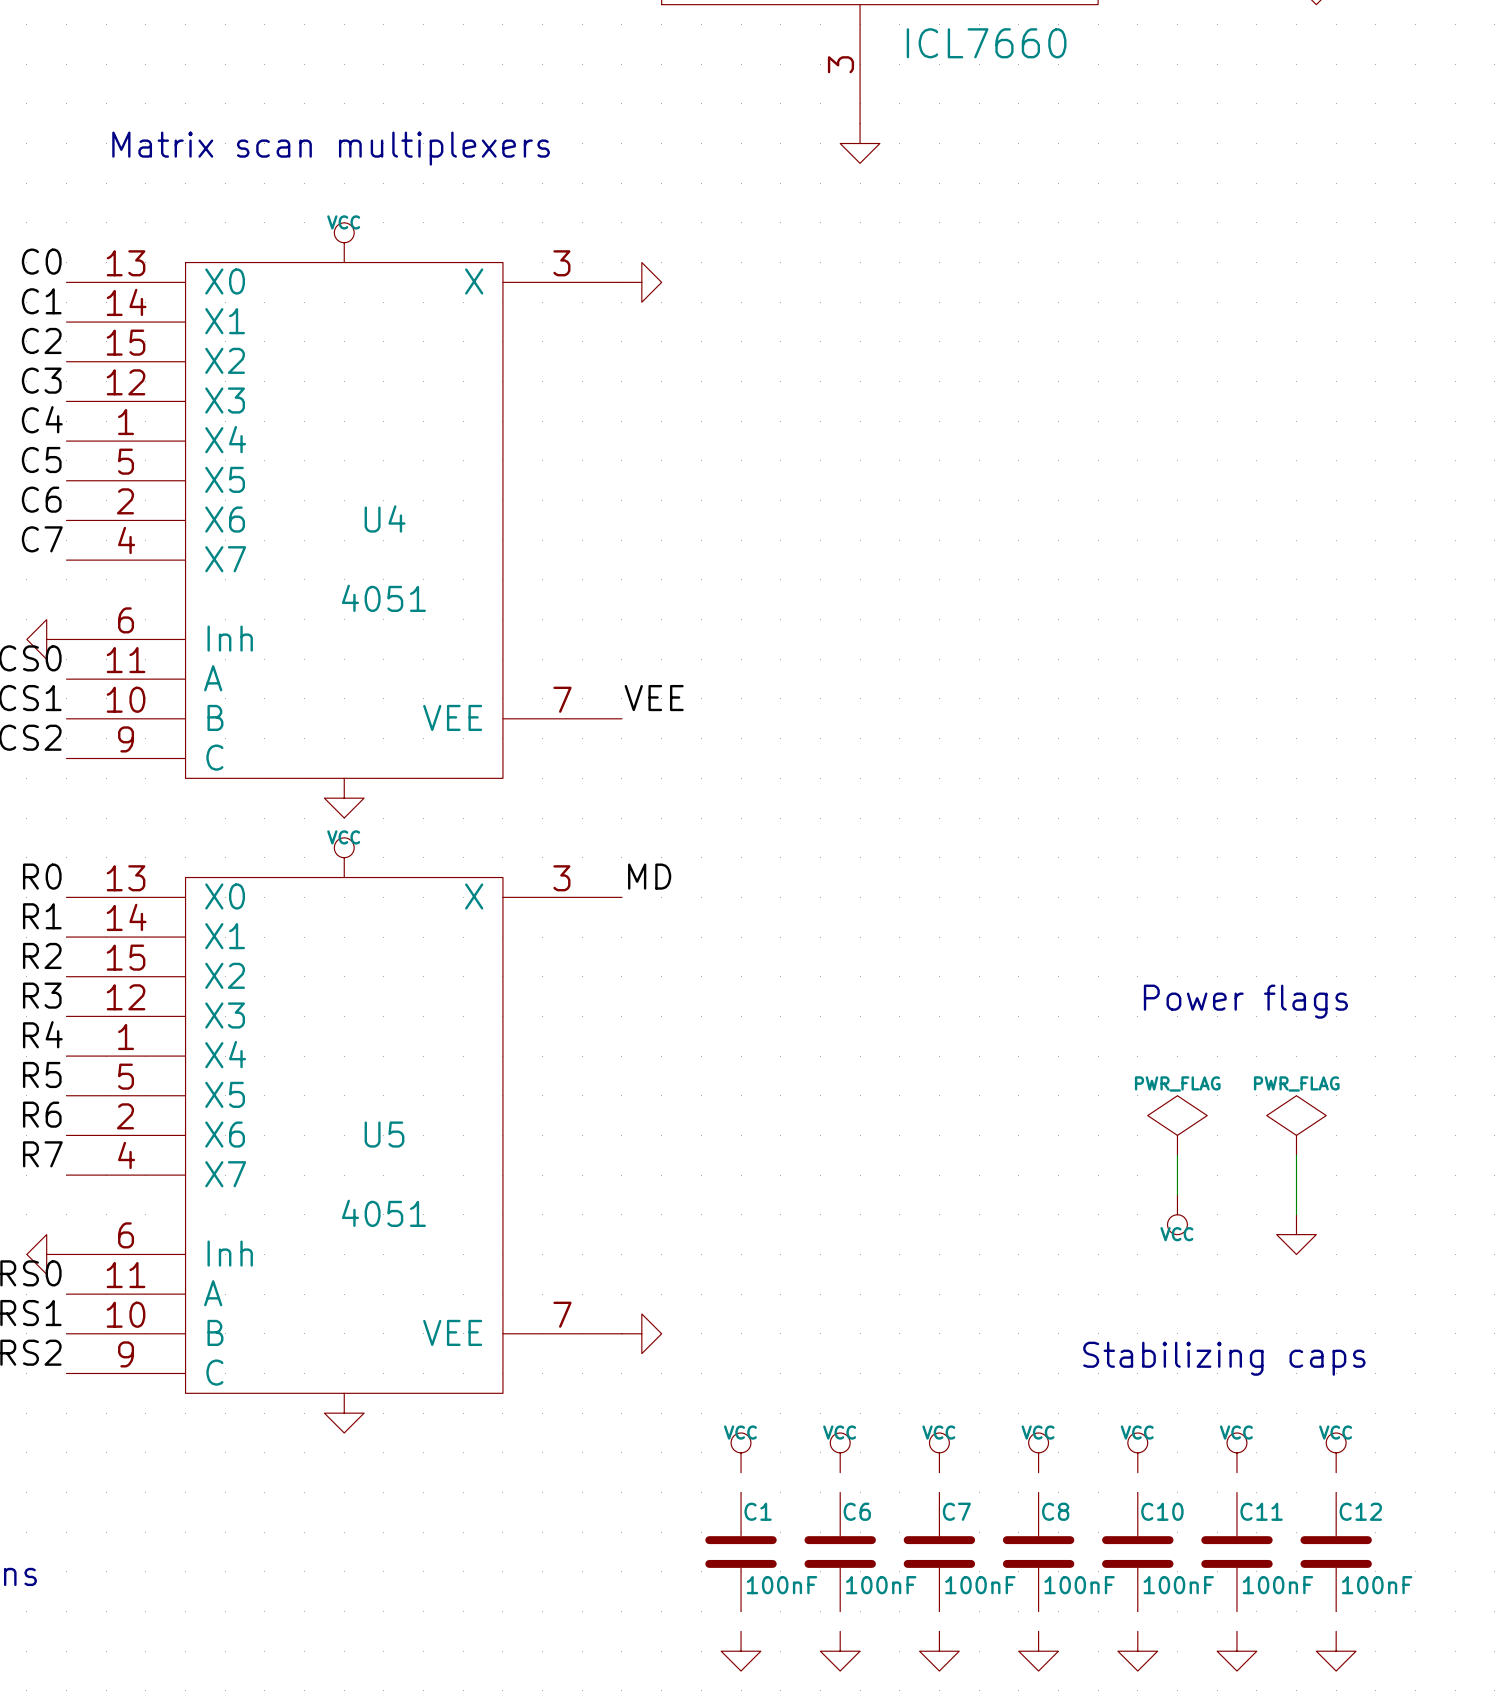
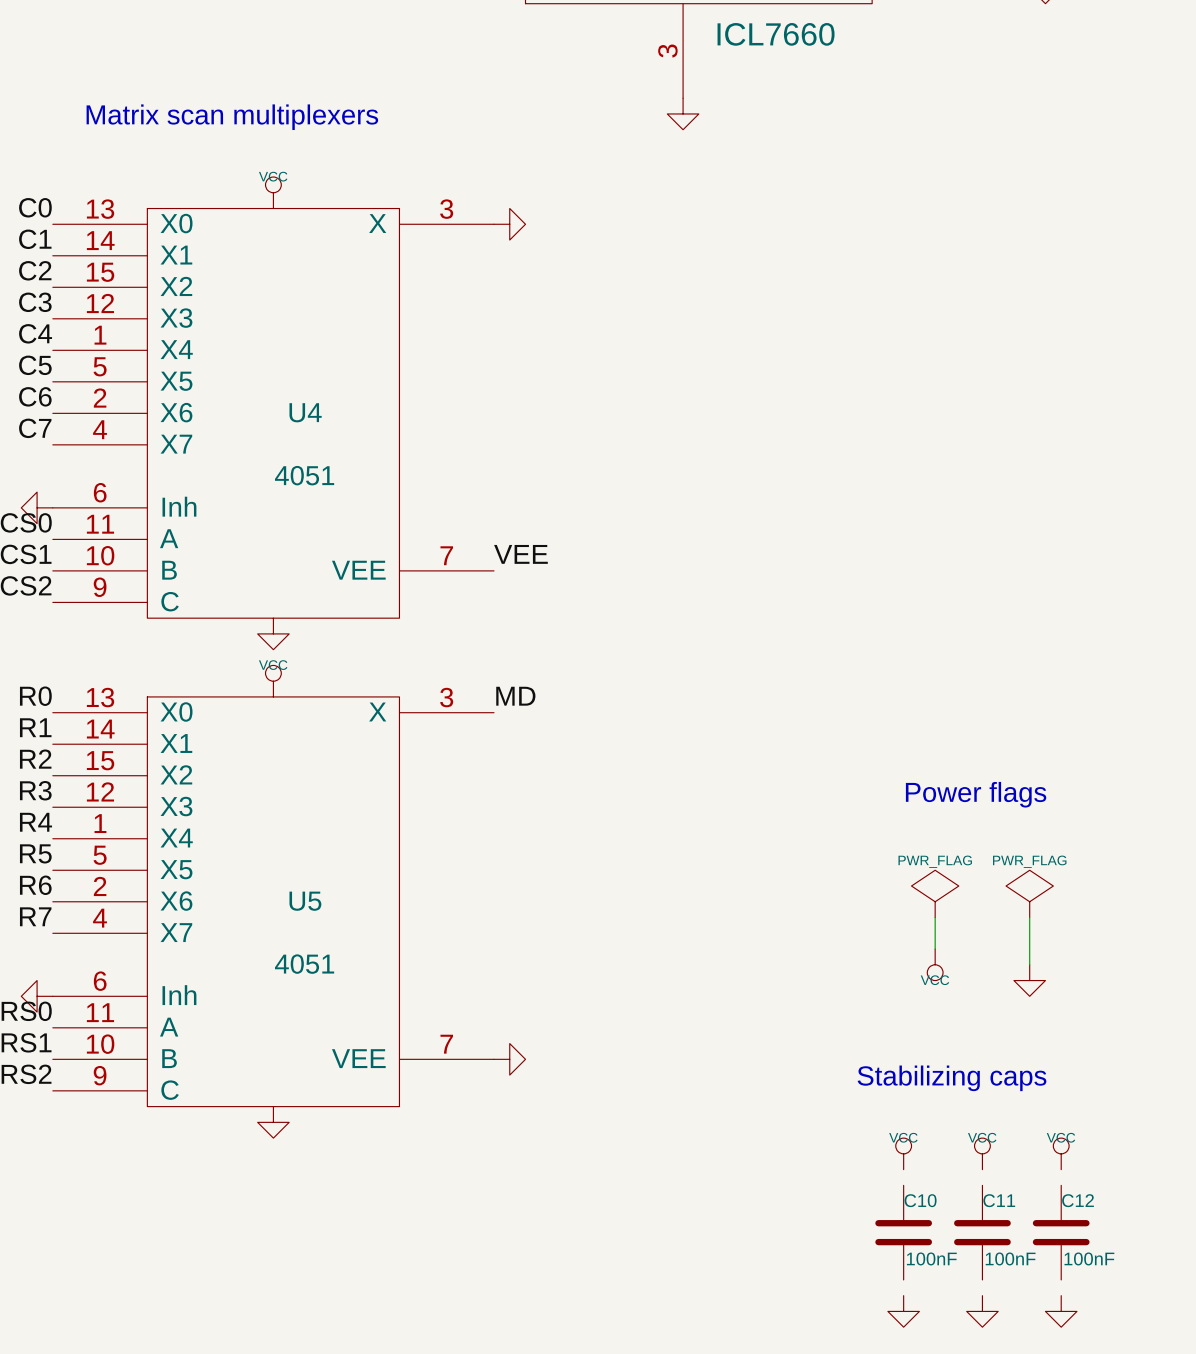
power symbol: VCC (741, 1452) -> none
power symbol: VCC (840, 1452) -> none
power symbol: VCC (939, 1452) -> none
power symbol: VCC (1038, 1452) -> none
C1: 100nF (741, 1552) -> none
C6: 100nF (840, 1552) -> none
C7: 100nF (939, 1552) -> none
C8: 100nF (1038, 1552) -> none
power symbol: (741, 1651) -> none
power symbol: (840, 1651) -> none
power symbol: (939, 1651) -> none
power symbol: (1038, 1651) -> none

